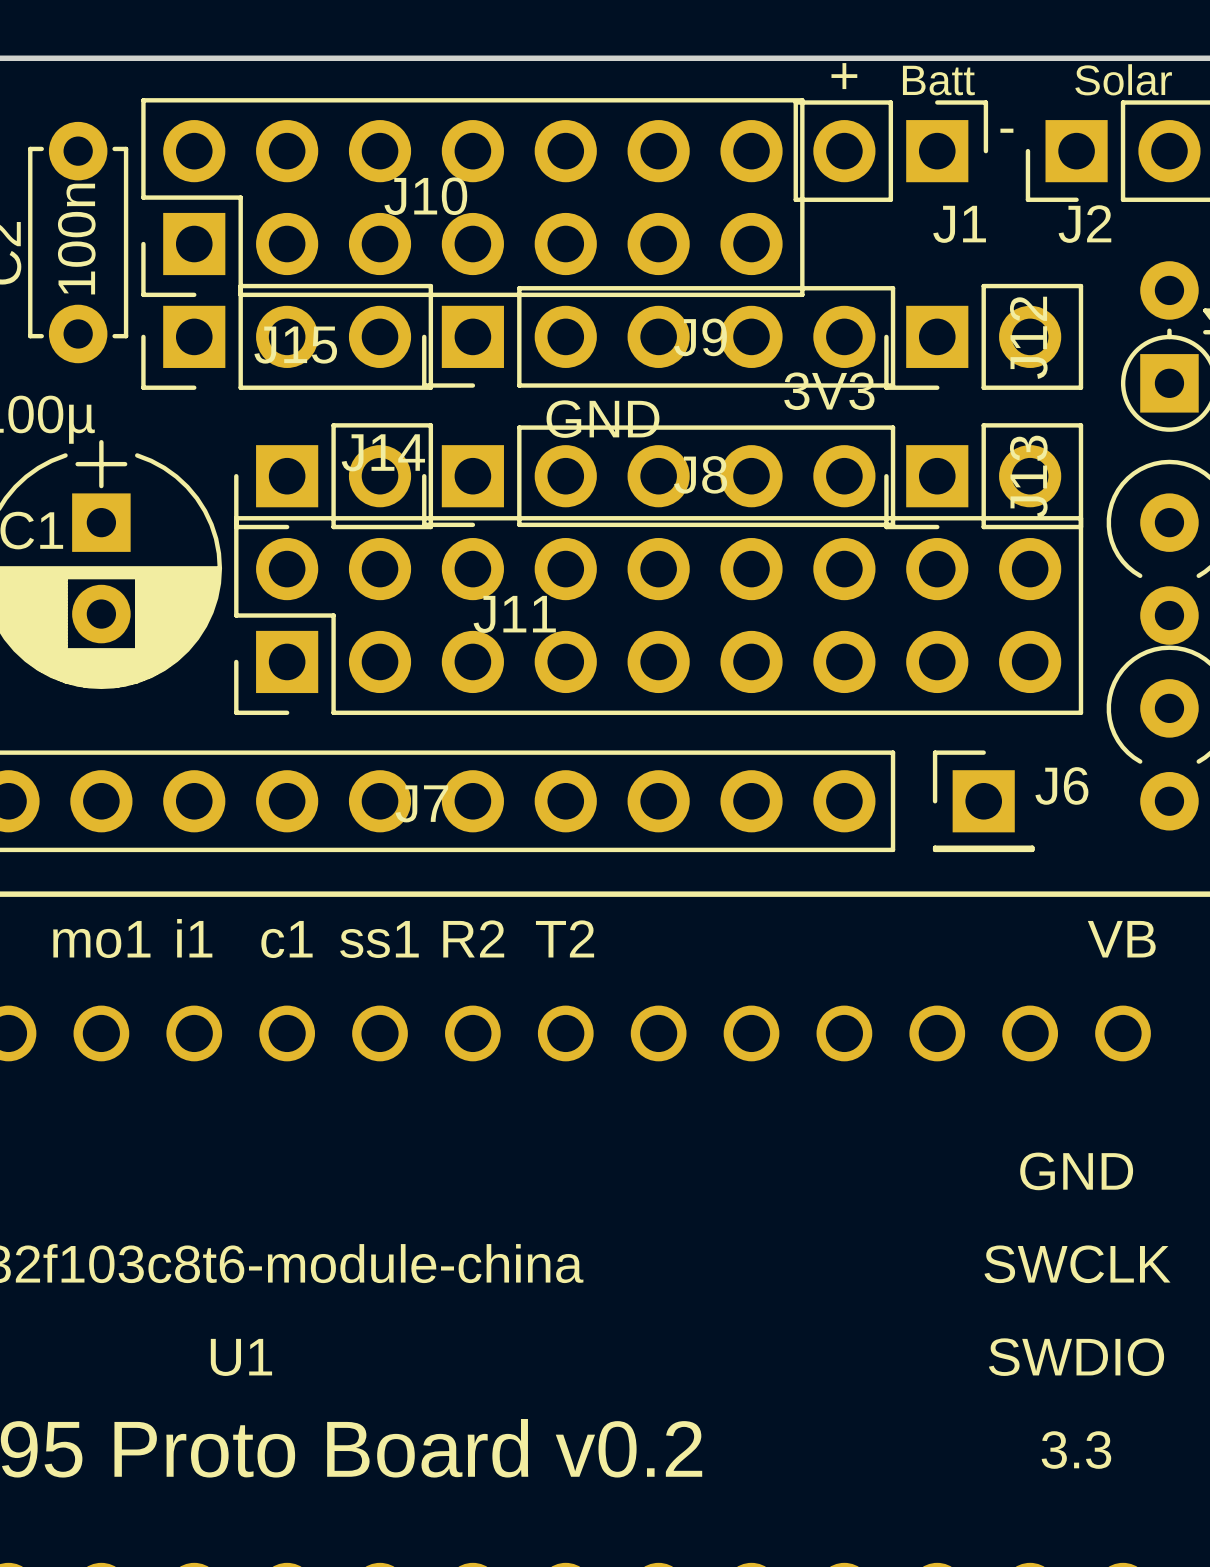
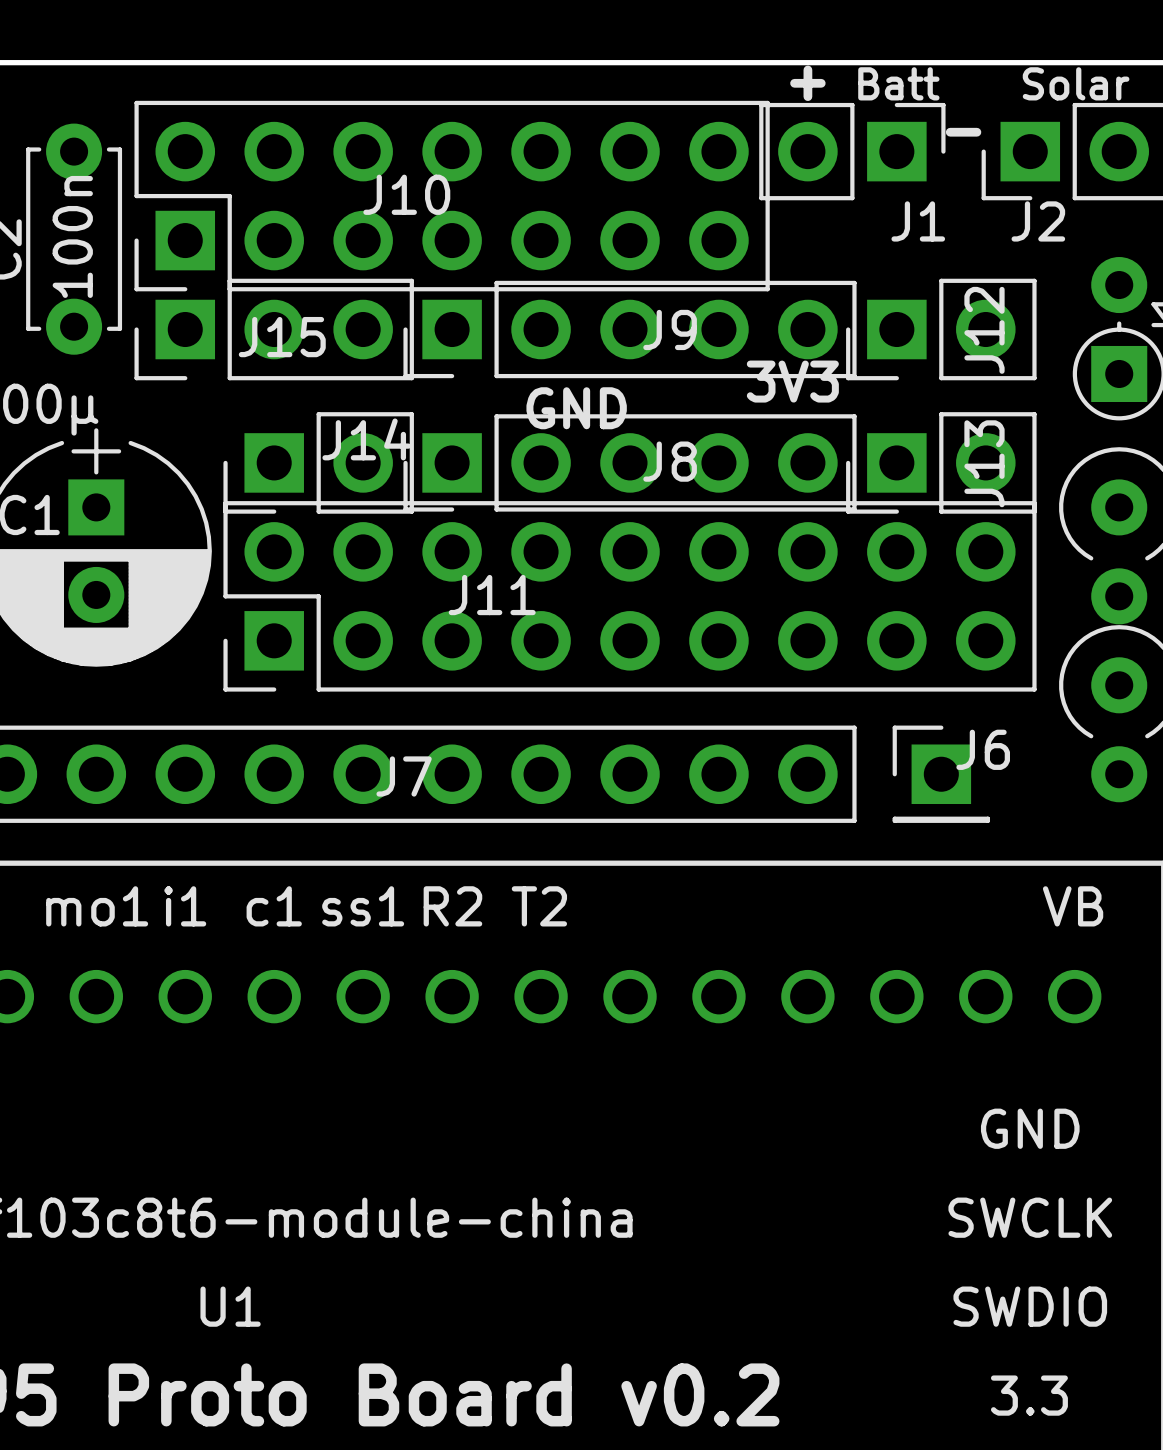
J6 name position: J6 (1061, 785) -> J6 (983, 749)

